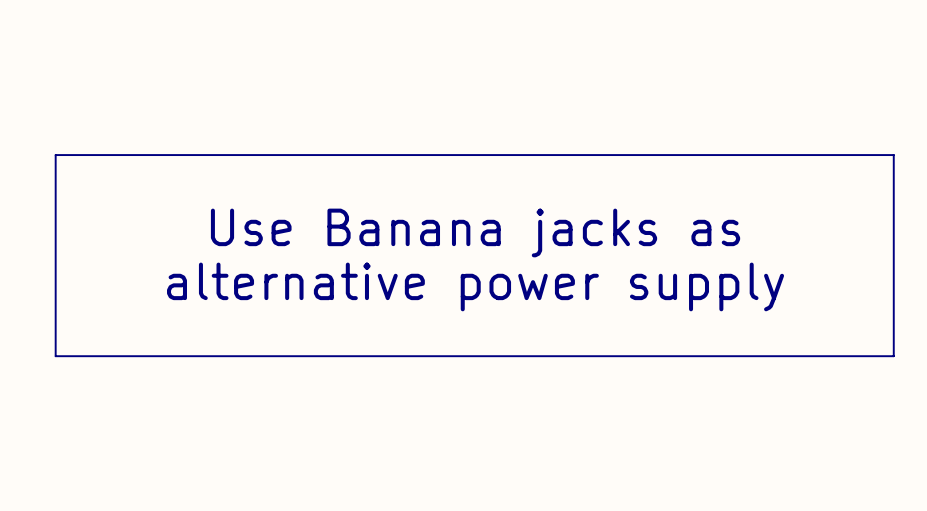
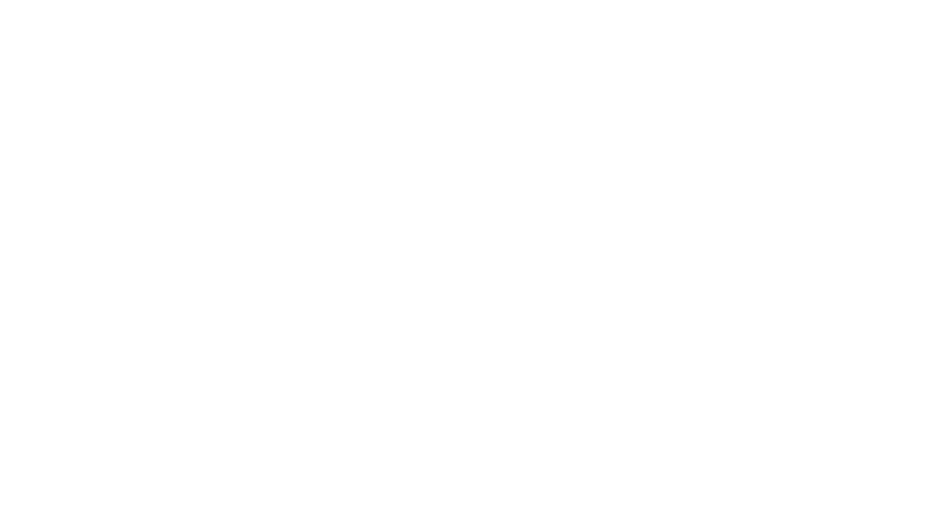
line: (55, 155) (893, 155) (893, 356) (55, 356) (55, 155) -> none
text: Use Banana jacks as (475, 232) -> none
text: alternative power supply (475, 286) -> none

